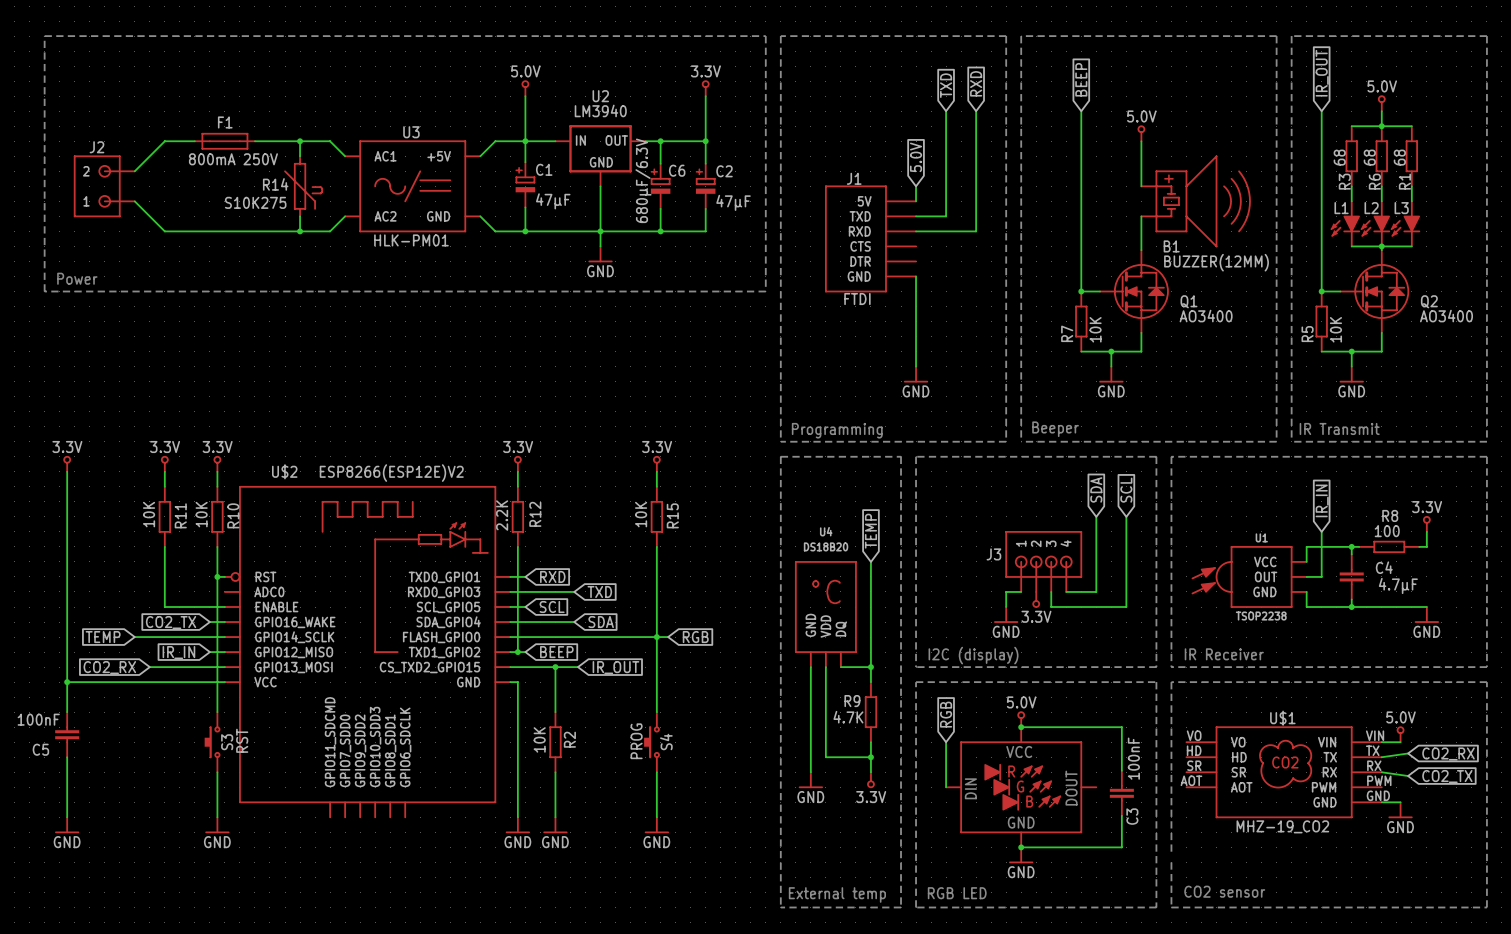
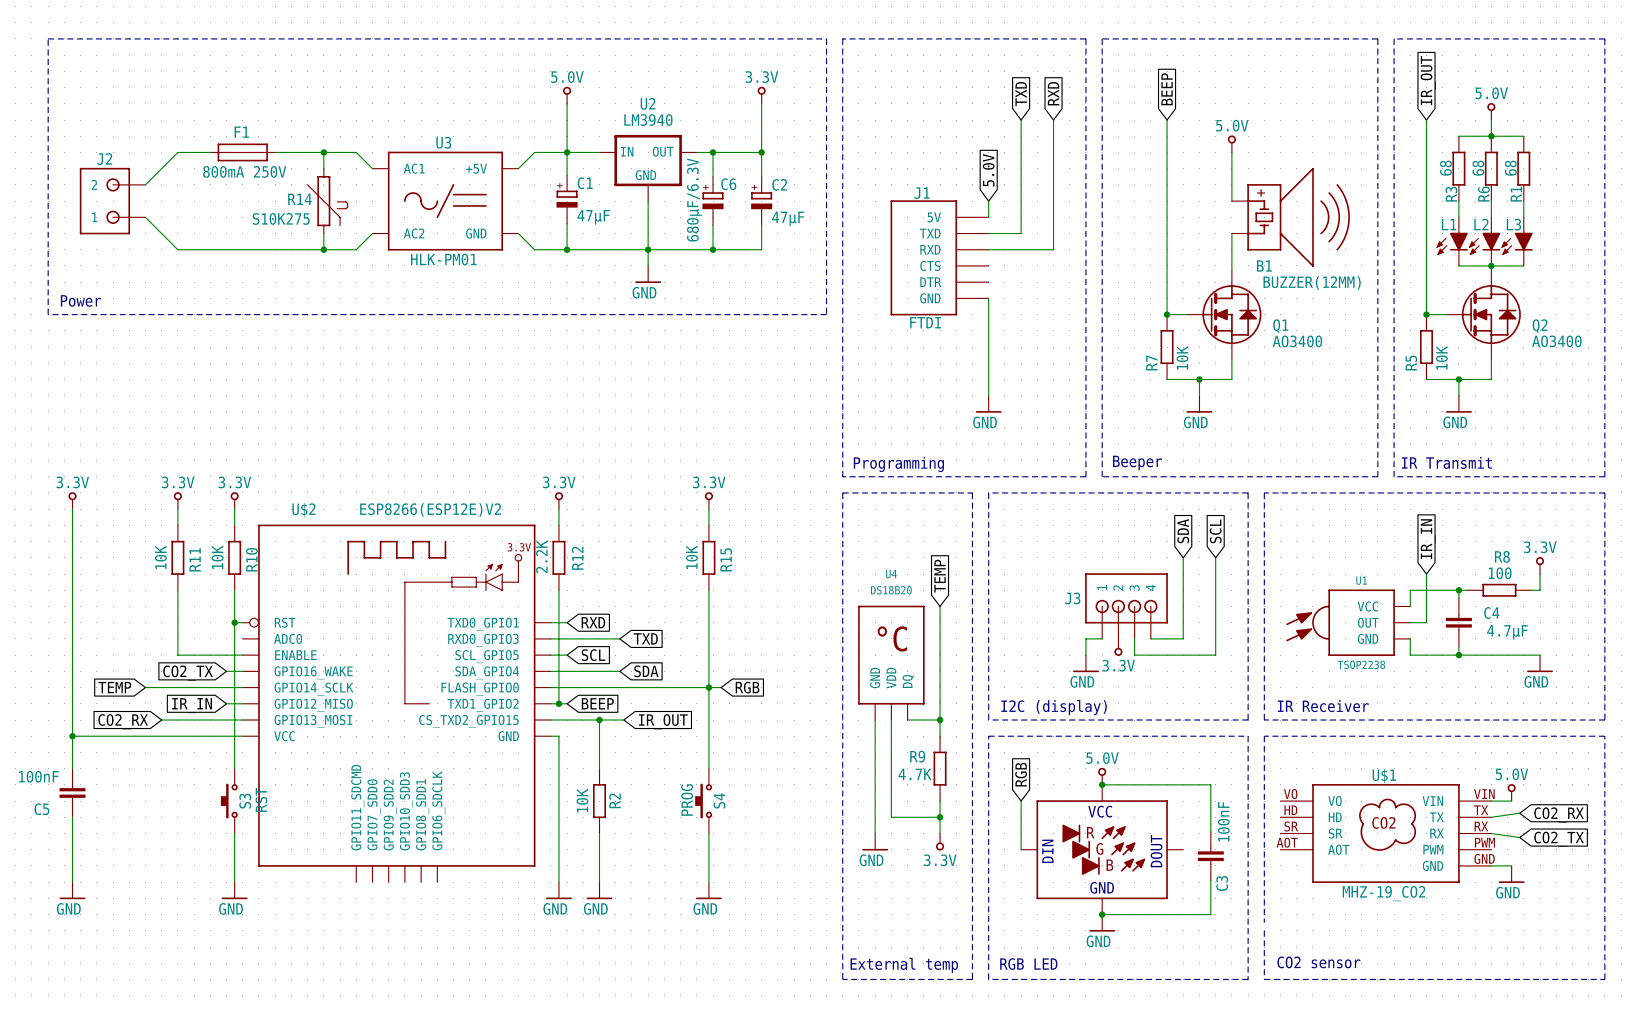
U$2 symbol: [224, 486, 511, 818] -> [242, 524, 551, 883]

